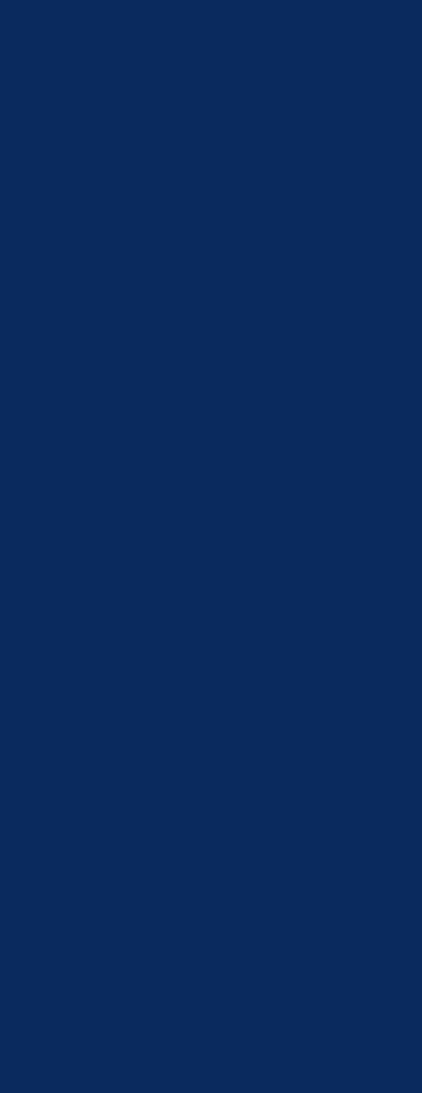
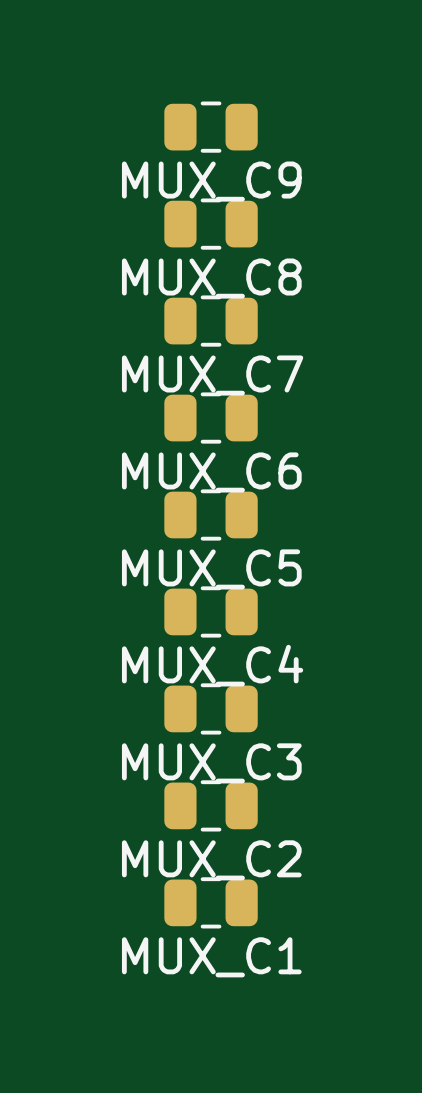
MUX_C9: none -> (211, 127)
MUX_C8: none -> (211, 224)
MUX_C7: none -> (211, 321)
MUX_C6: none -> (211, 418)
MUX_C5: none -> (211, 514)
MUX_C4: none -> (211, 611)
MUX_C3: none -> (211, 708)
MUX_C2: none -> (211, 805)
MUX_C1: none -> (211, 902)

